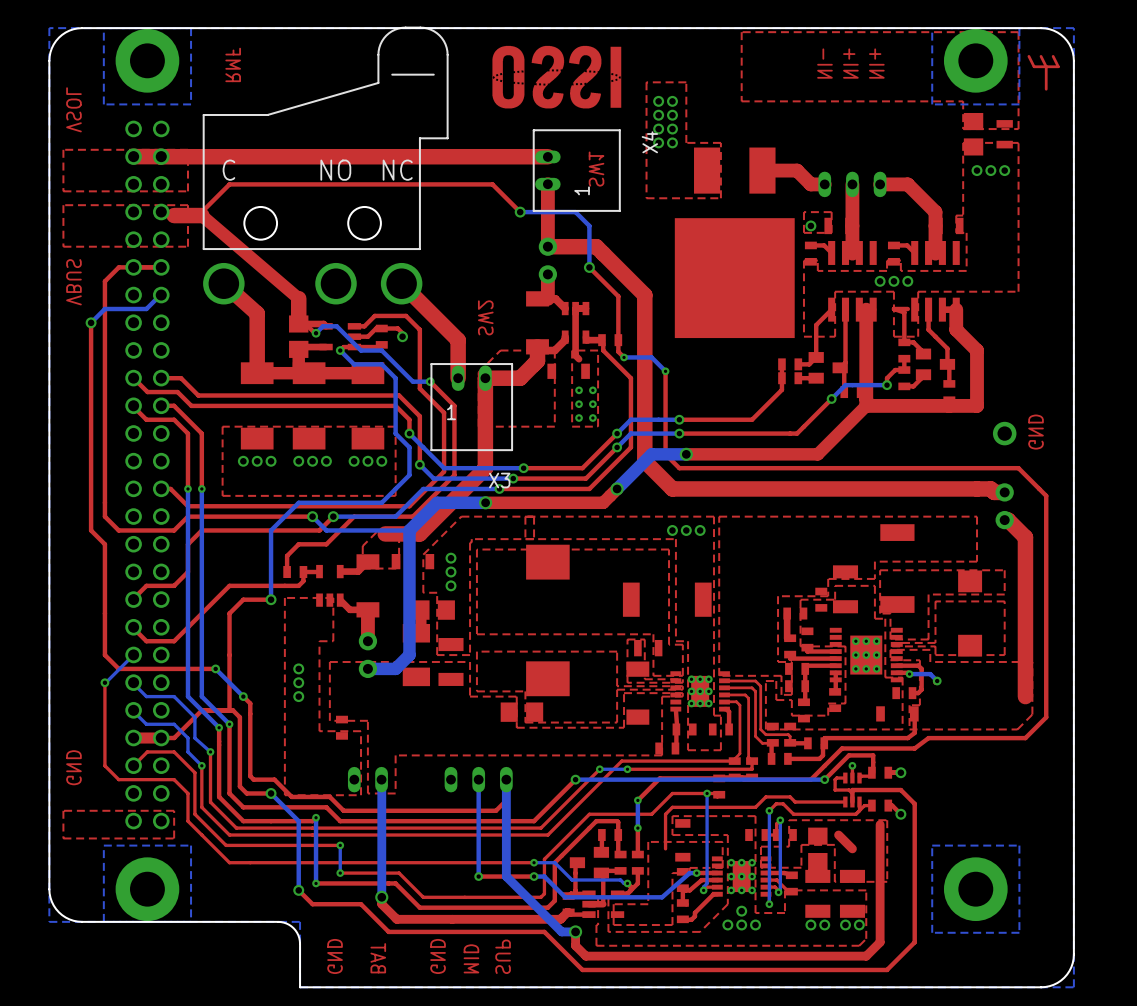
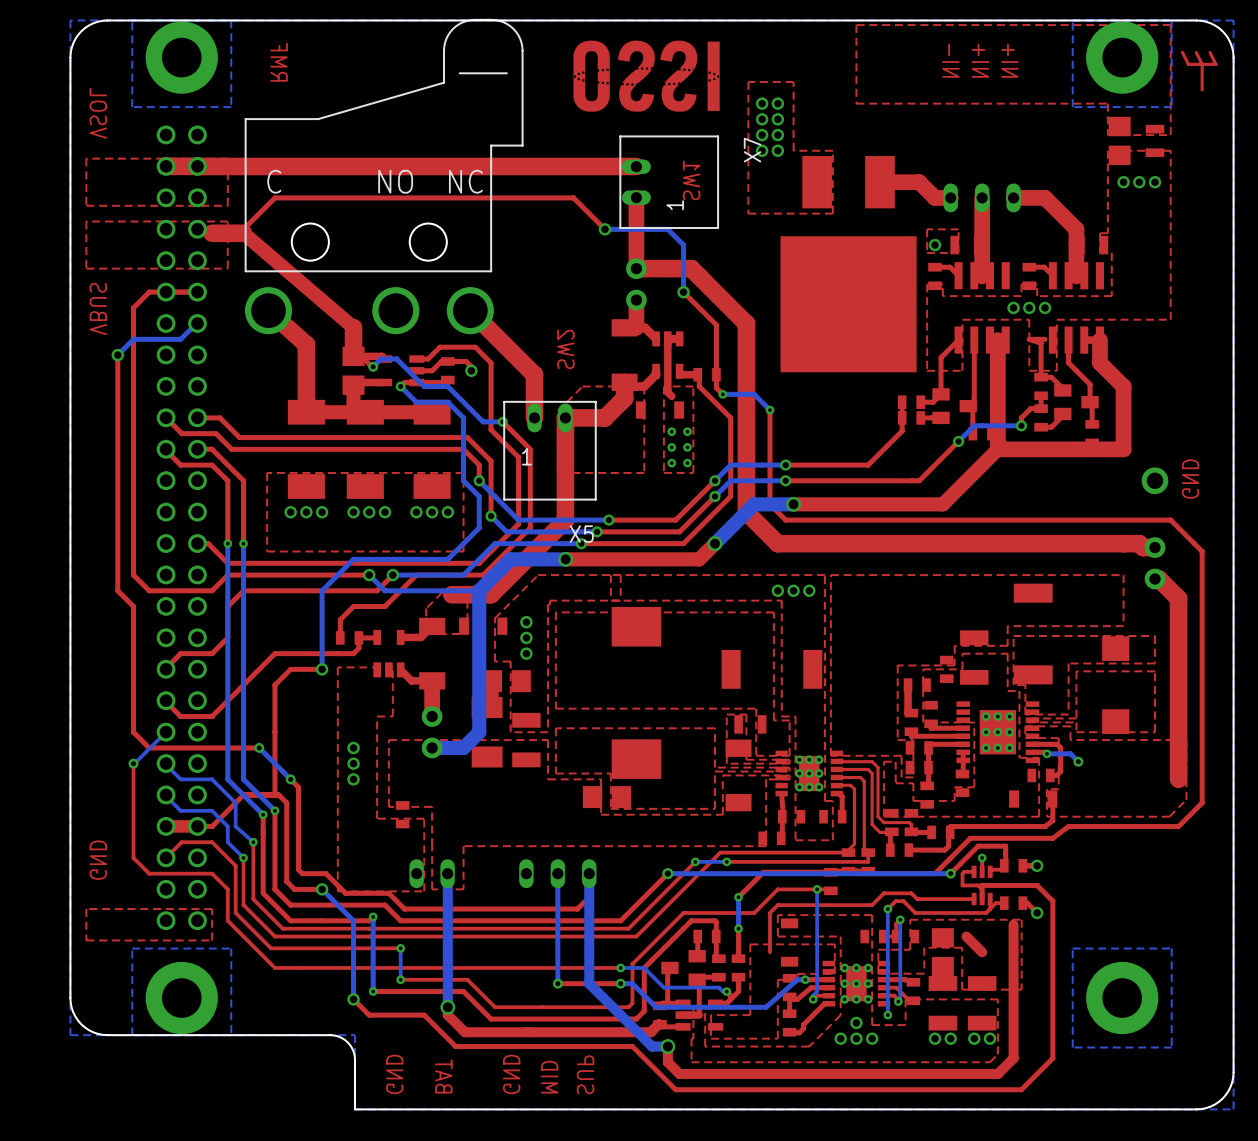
X4 name: X4 (649, 142) -> X7 (752, 150)
X3 name: X3 (499, 480) -> X5 (581, 534)

